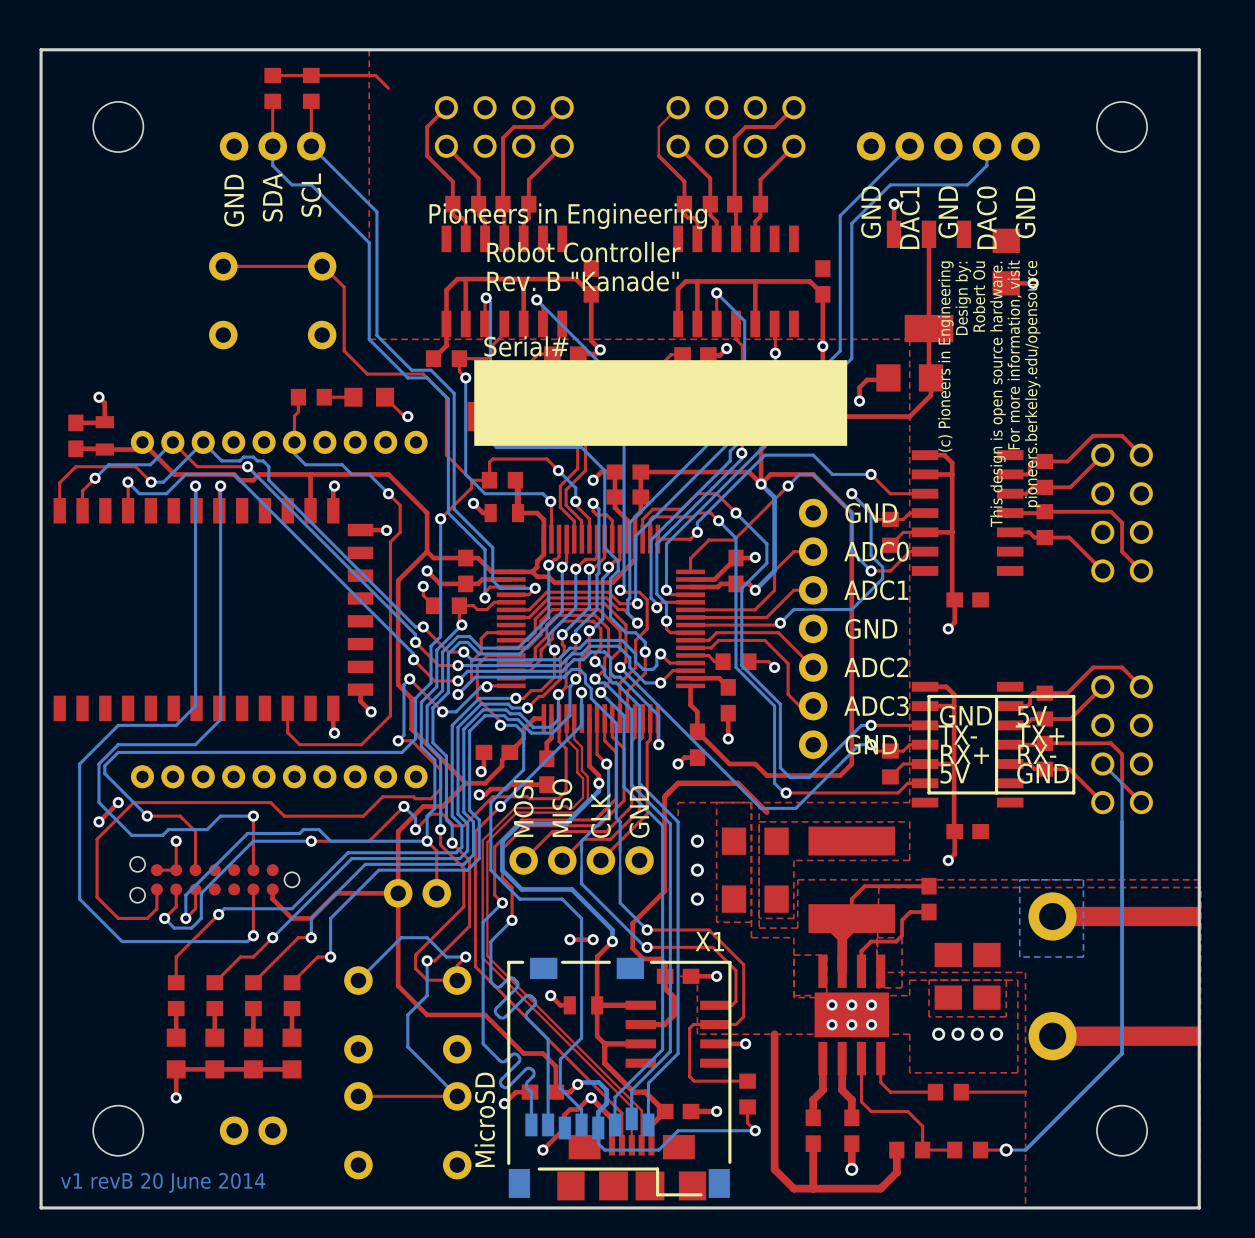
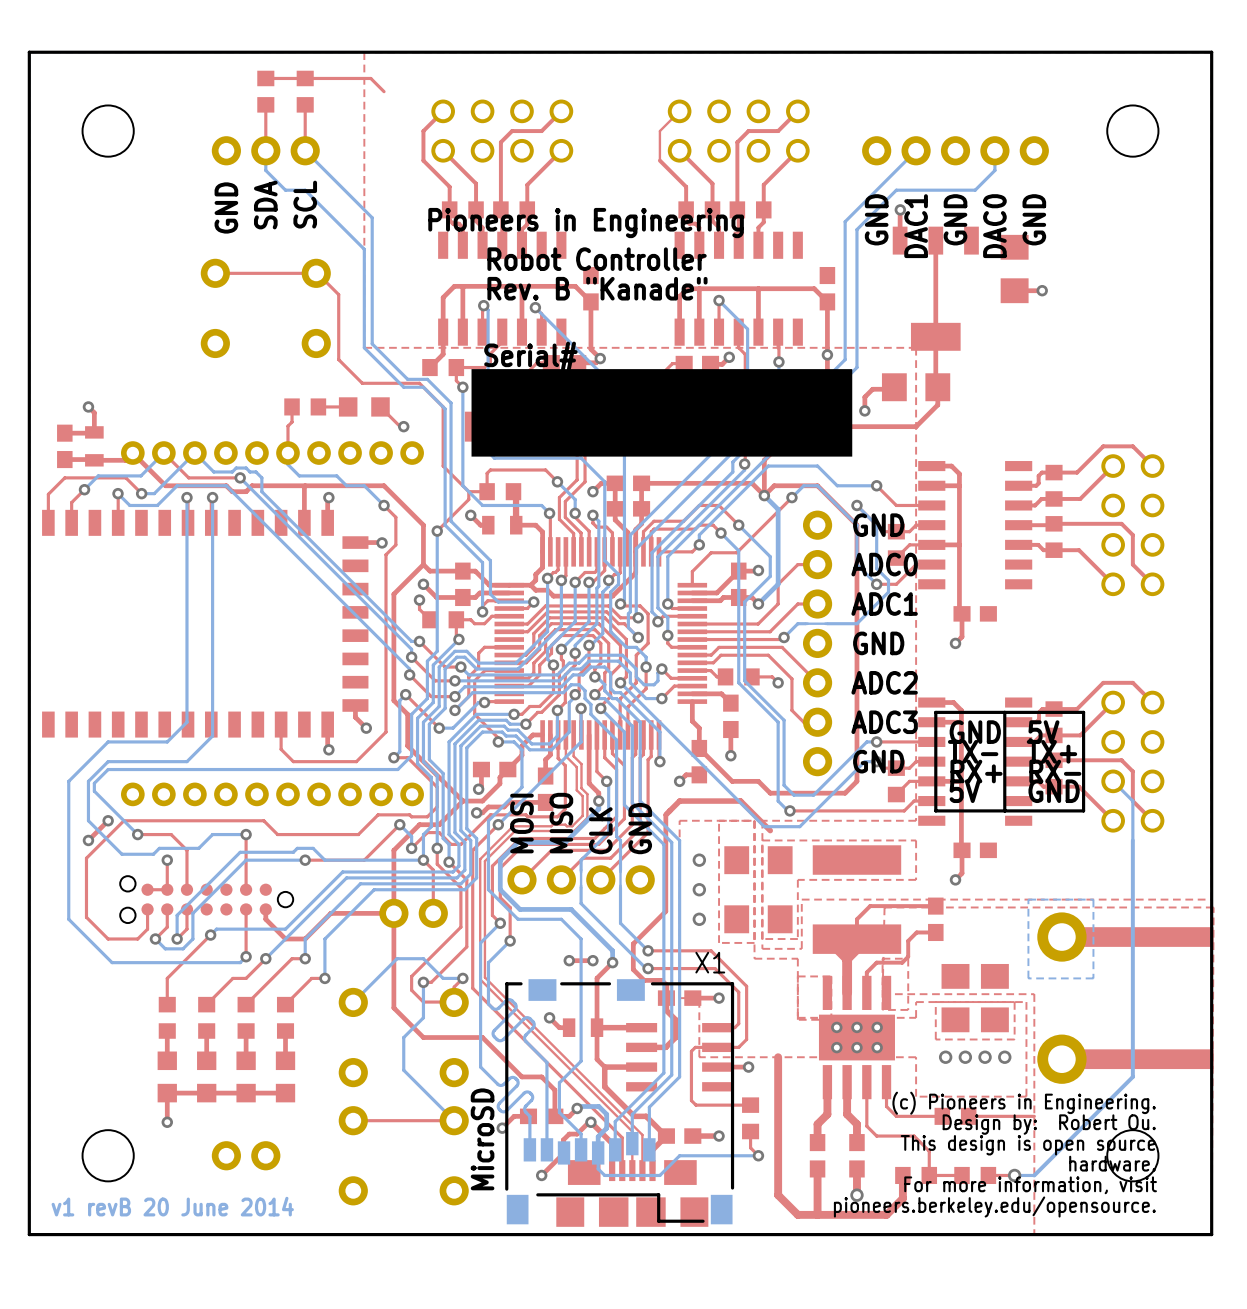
text: Robert Ou (979, 296) -> none
text: Design by: (963, 298) -> none
text: For more information, visit (1014, 354) -> none
text: (c) Pioneers in Engineering (945, 356) -> none
text: pioneers.berkeley.edu/opensource (1032, 383) -> none
text: This design is open source hardware. (997, 394) -> none
text: none -> (c) Pioneers in Engineering. (1024, 1103)
text: none -> Design by: Robert Ou. (1049, 1124)
text: none -> This design is open source (1028, 1145)
text: none -> hardware. (1112, 1163)
text: none -> For more information, visit (1030, 1185)
text: none -> pioneers.berkeley.edu/opensource. (994, 1206)

